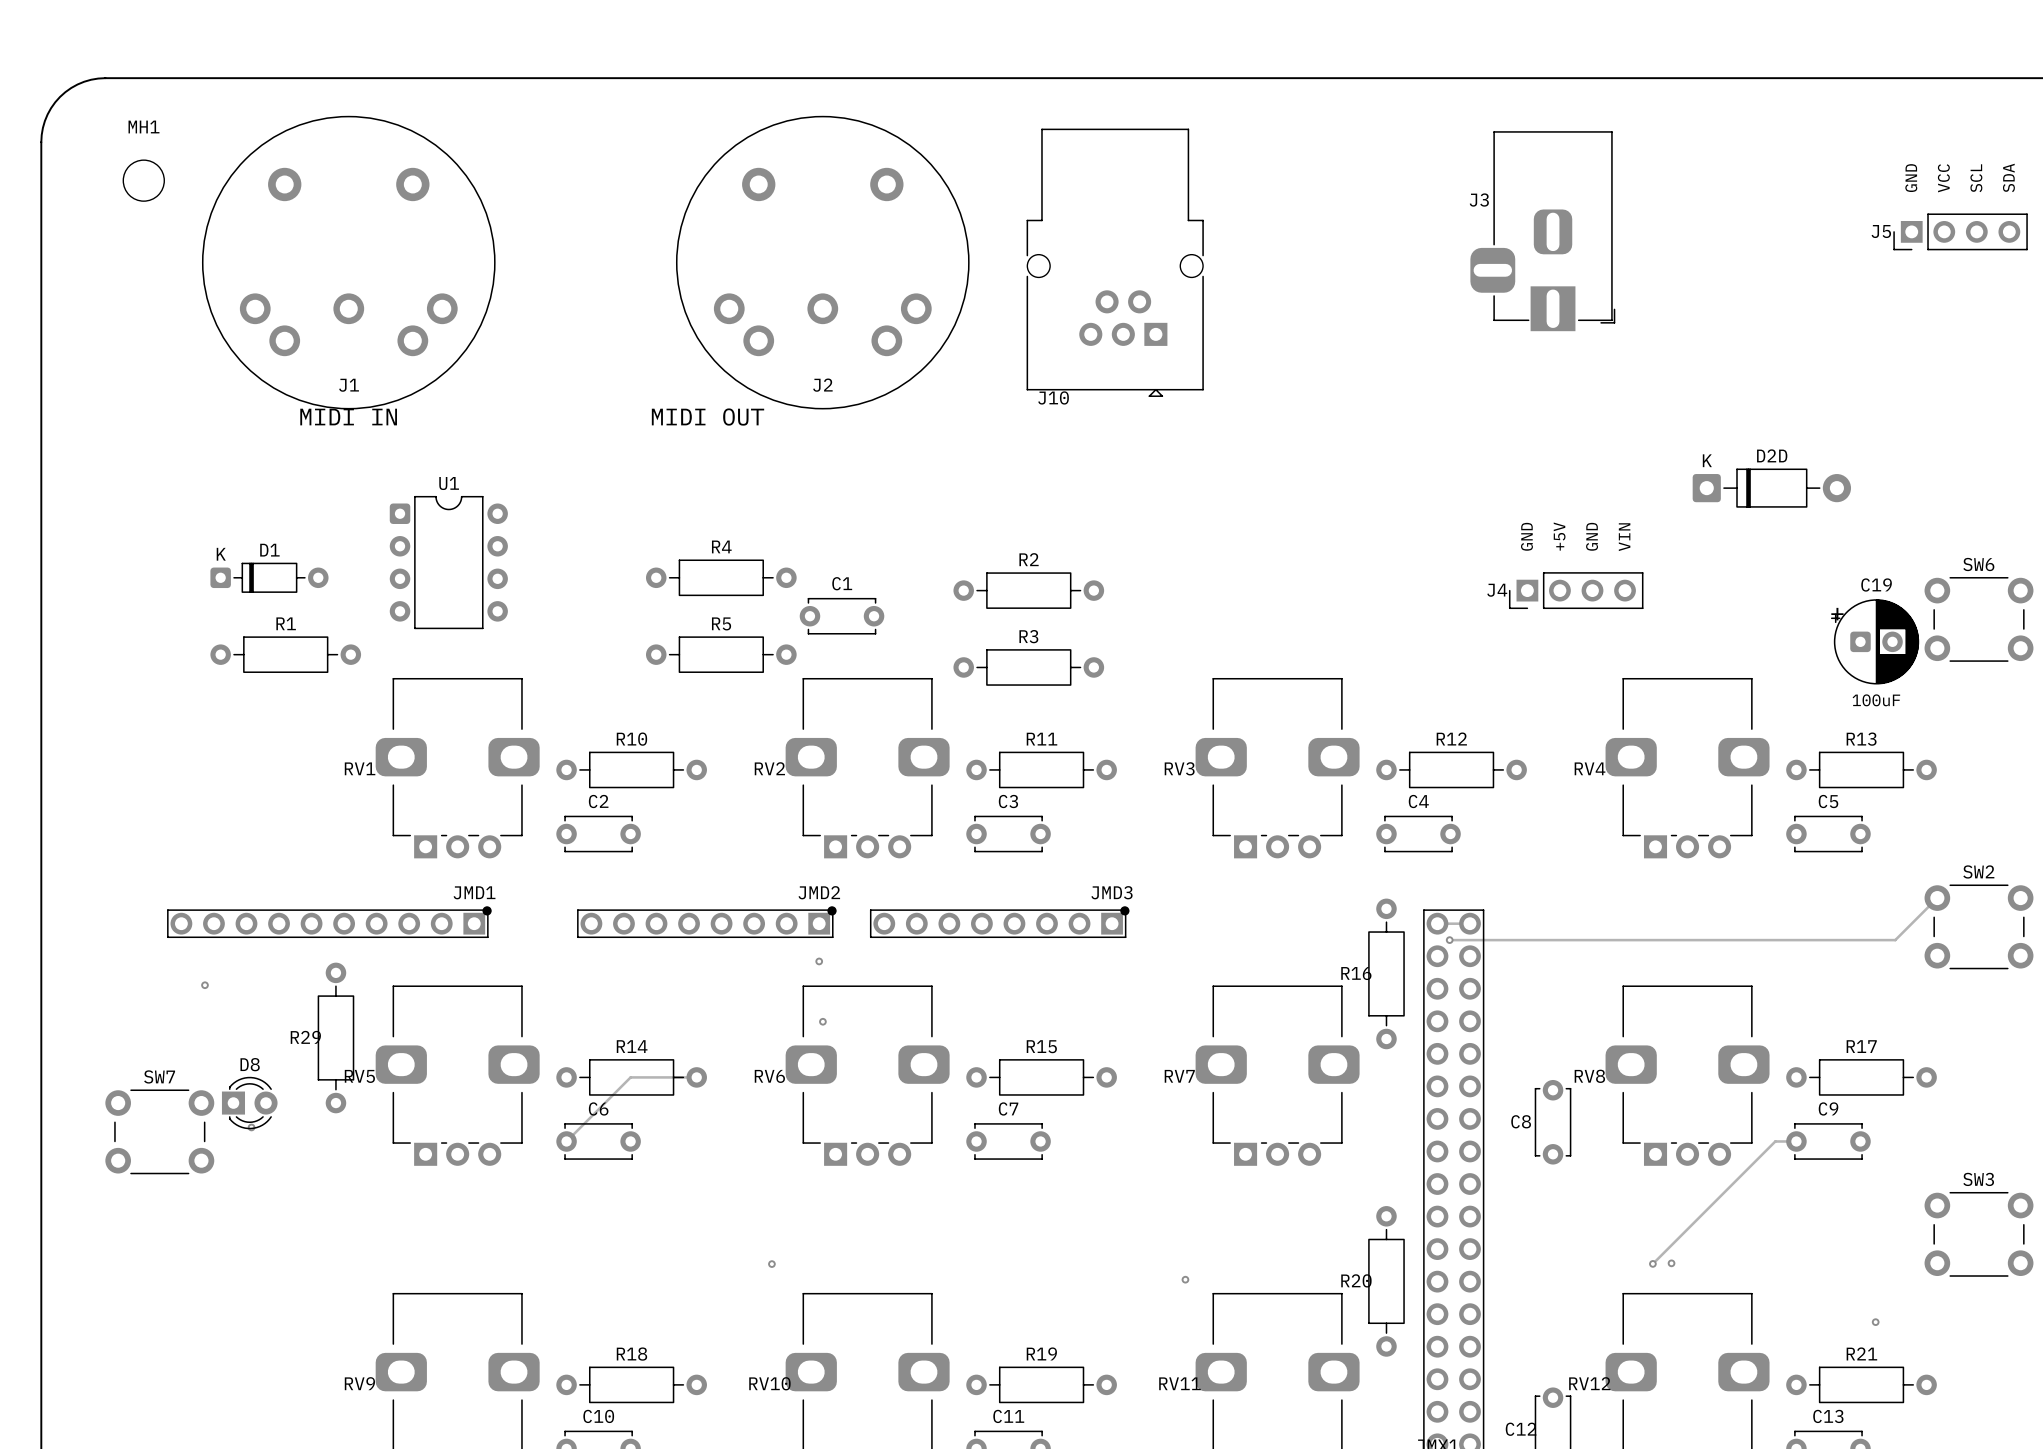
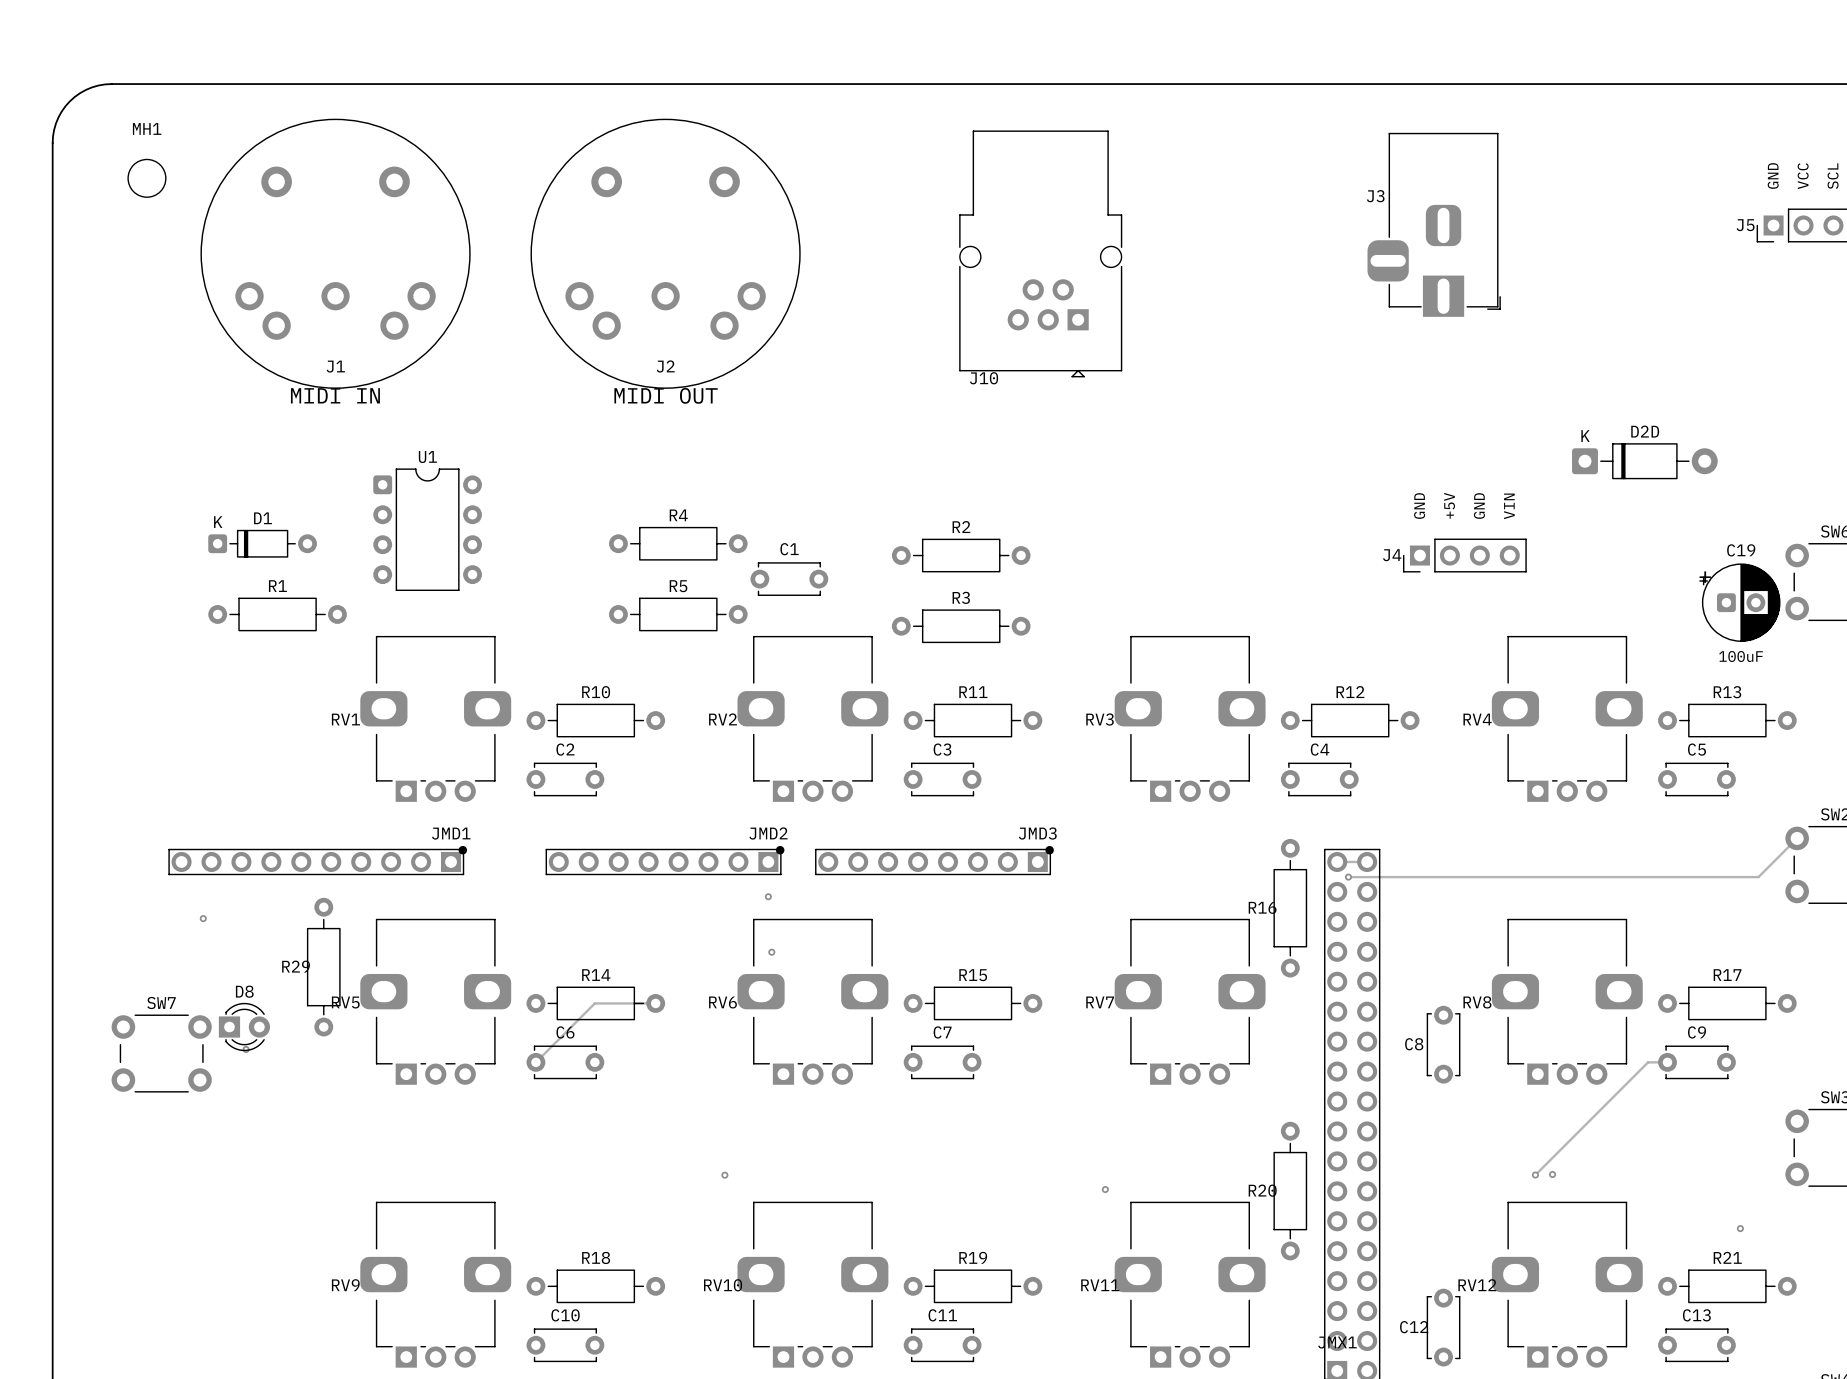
J2 position: (822, 262) -> (665, 253)

